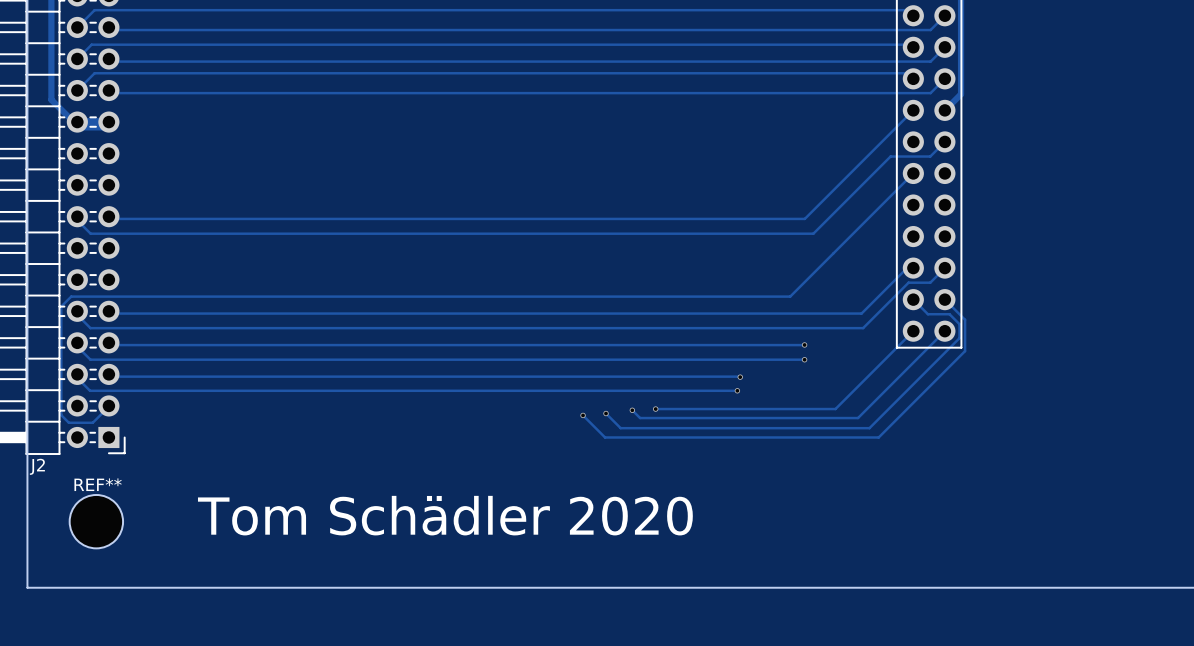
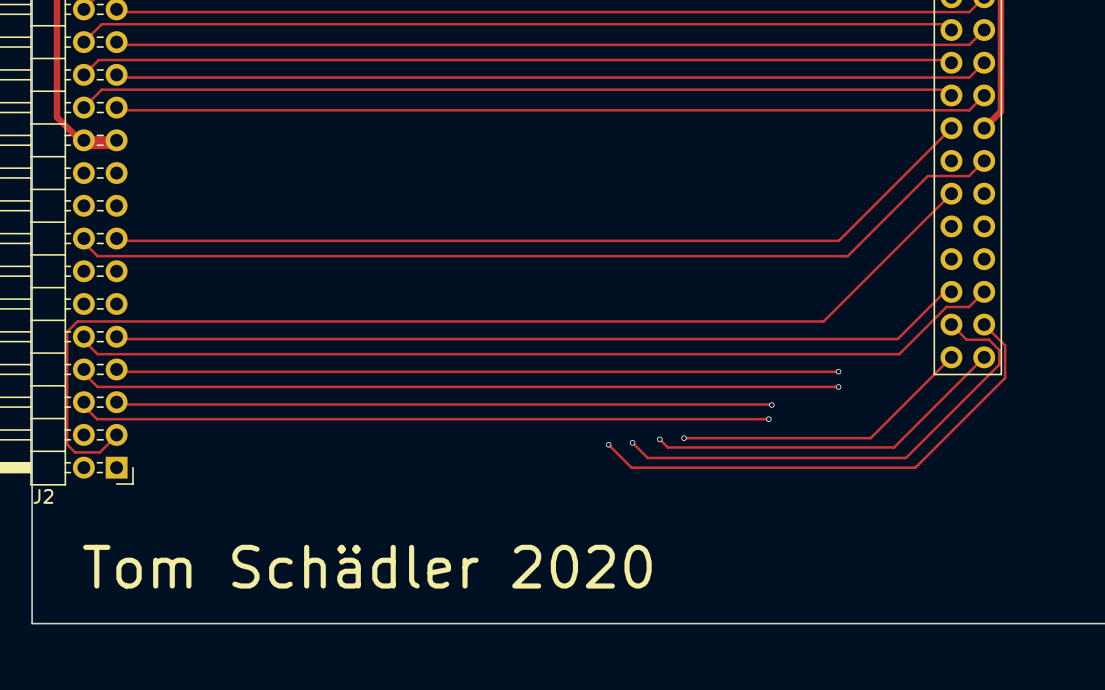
text position: Tom Schädler 2020 (445, 515) -> Tom Schädler 2020 (367, 566)
REF**: (96, 521) -> none

